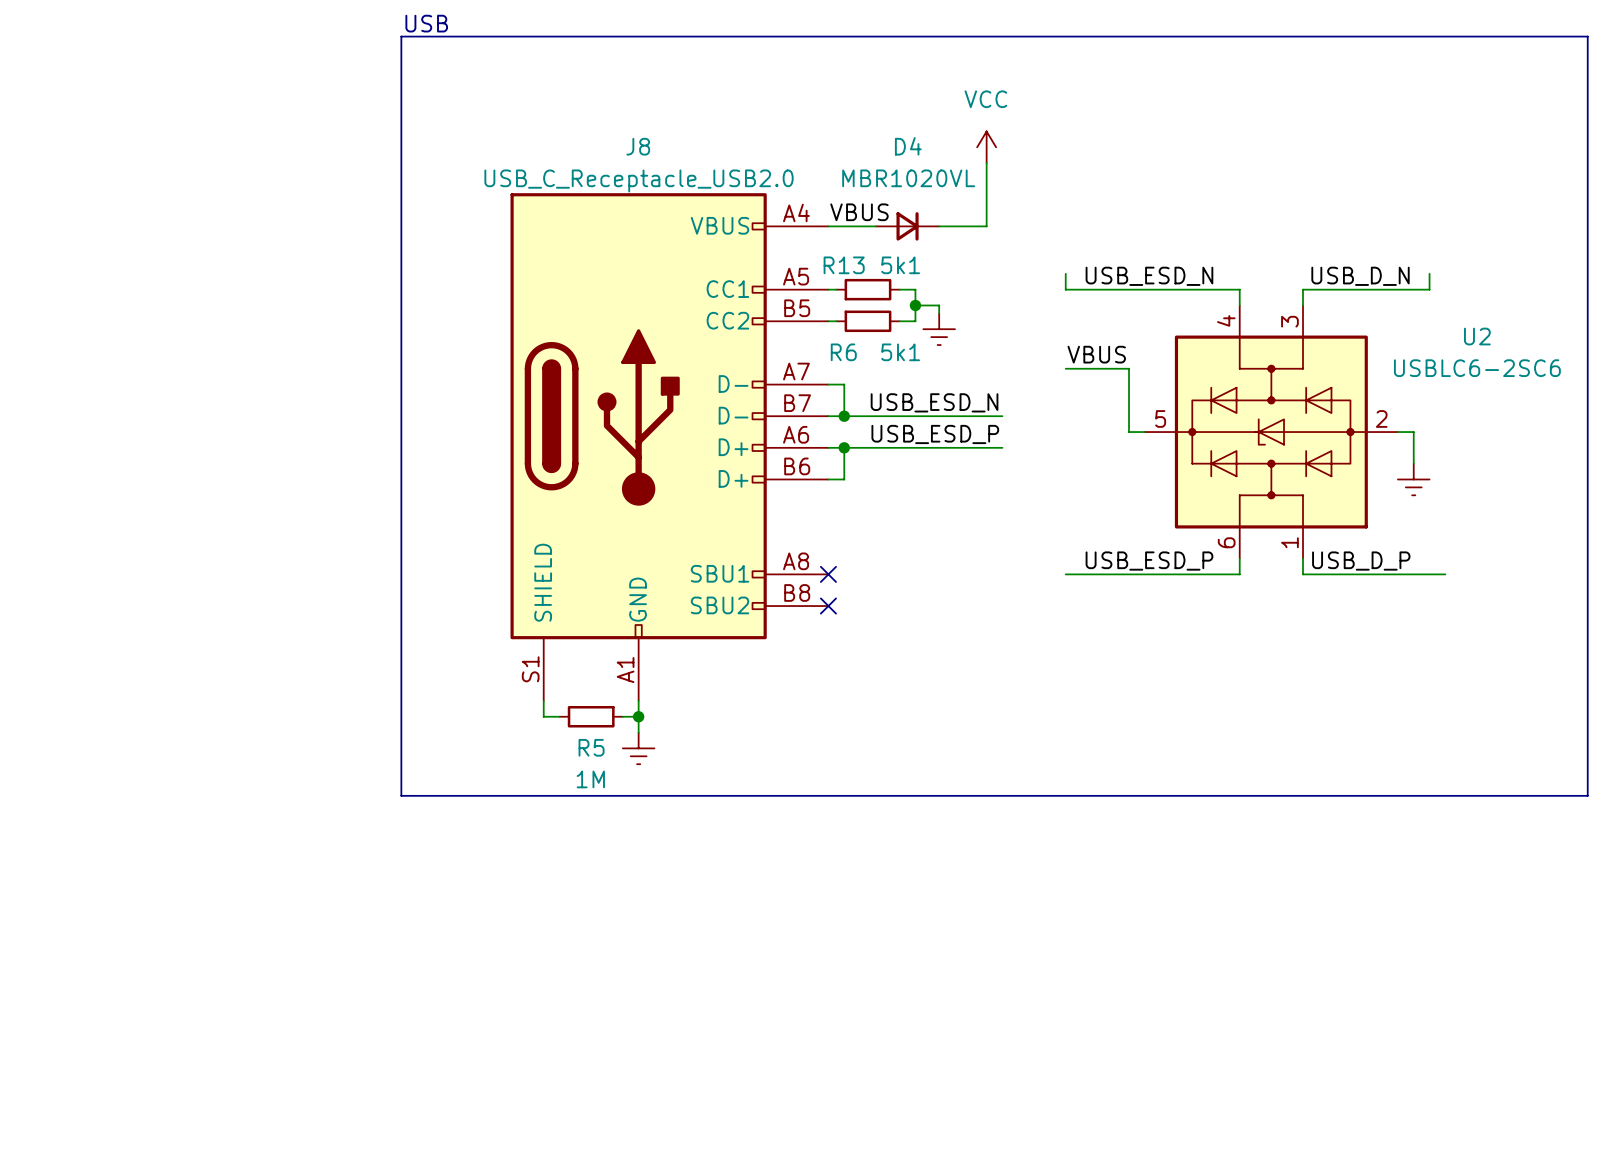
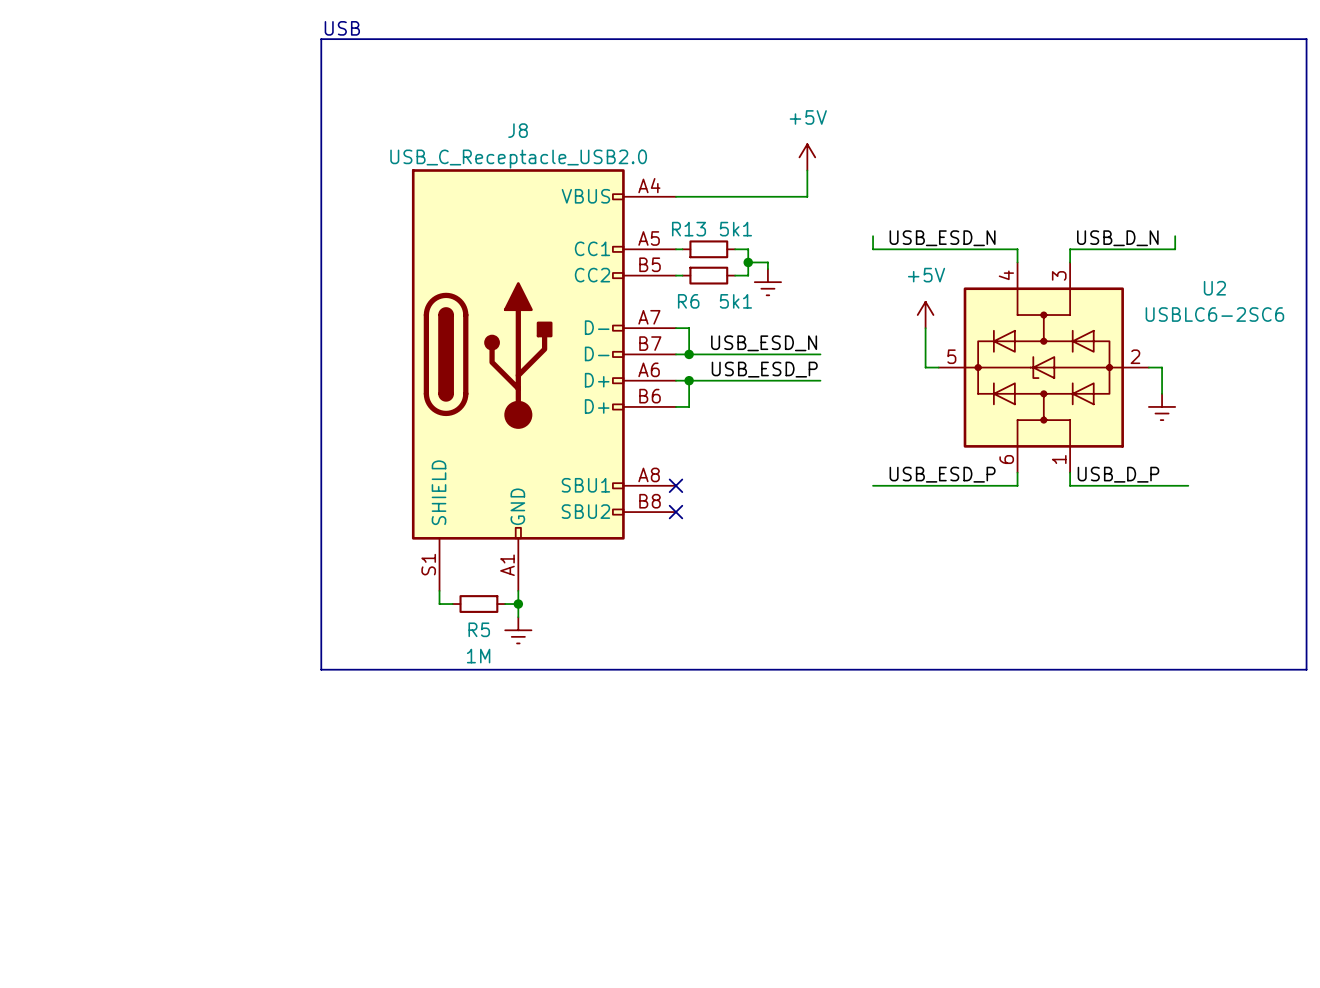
power symbol: VCC (986, 147) -> none
power symbol: none -> +5V (807, 157)
label: VBUS (859, 212) -> none
D4: MBR1020VL (907, 226) -> none
label: VBUS (1096, 354) -> none
wire: (1065, 368) (1129, 368) (1129, 384) -> none
power symbol: none -> +5V (925, 315)

